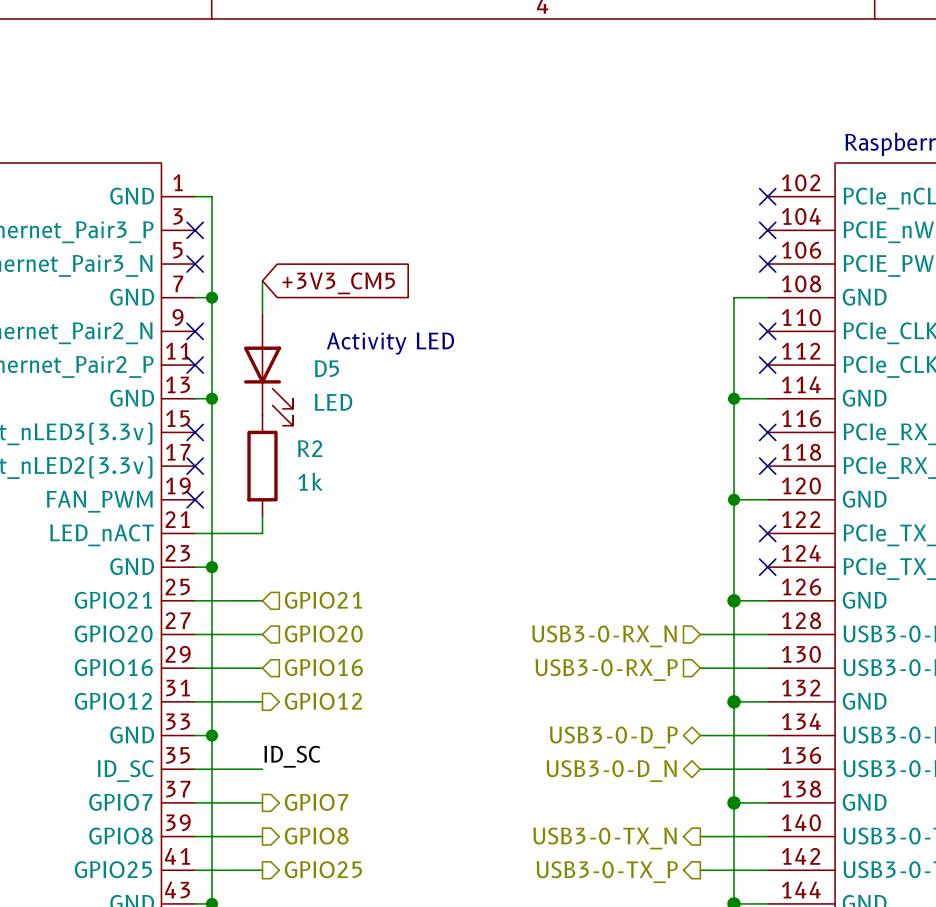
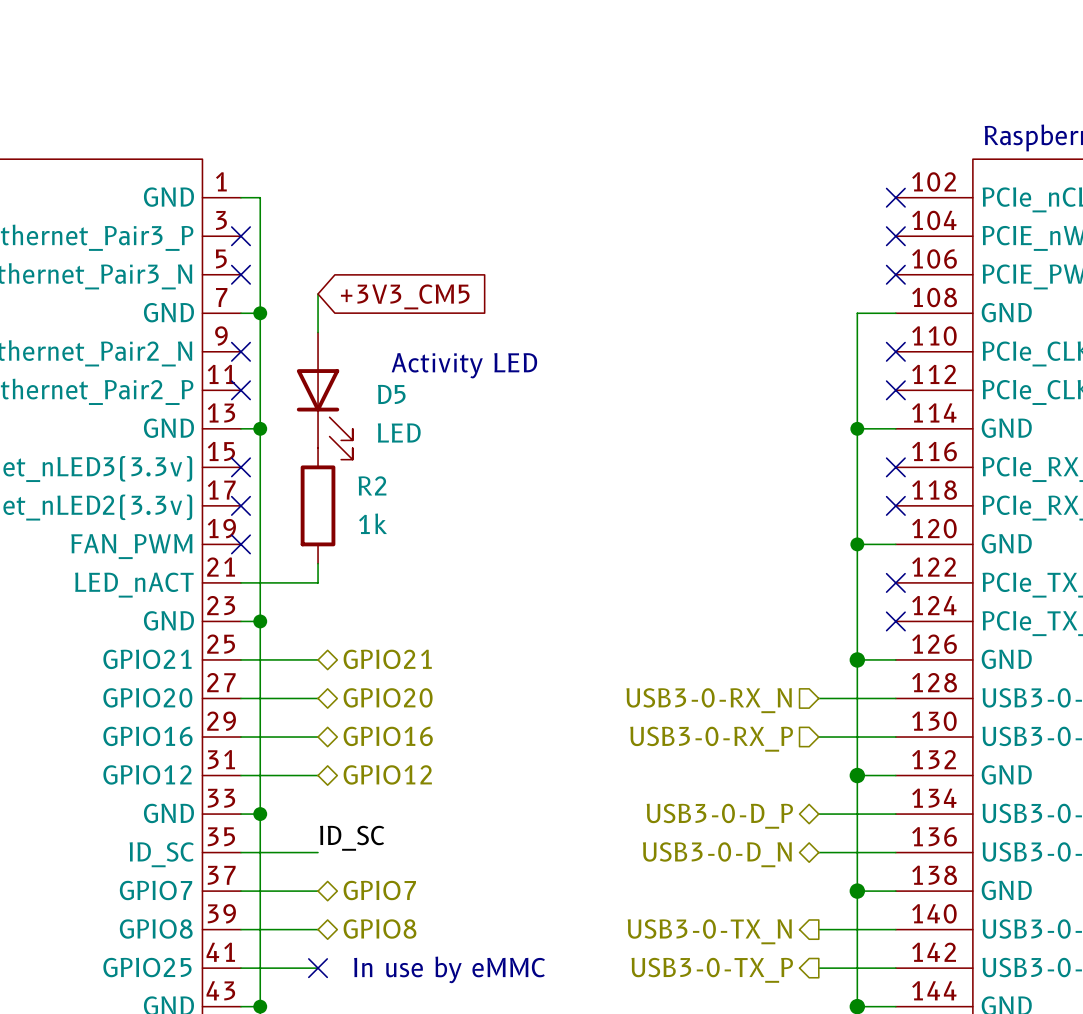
hierarchical label shape: input (323, 600) -> bidirectional (387, 659)
hierarchical label shape: input (323, 633) -> bidirectional (388, 697)
hierarchical label shape: input (323, 667) -> bidirectional (388, 736)
hierarchical label shape: output (323, 701) -> bidirectional (387, 774)
hierarchical label shape: output (316, 802) -> bidirectional (379, 890)
hierarchical label shape: output (316, 836) -> bidirectional (379, 929)
hierarchical label: GPIO25 (323, 869) -> none
no-connect mark: none -> (318, 968)
text: none -> In use by eMMC (449, 969)

